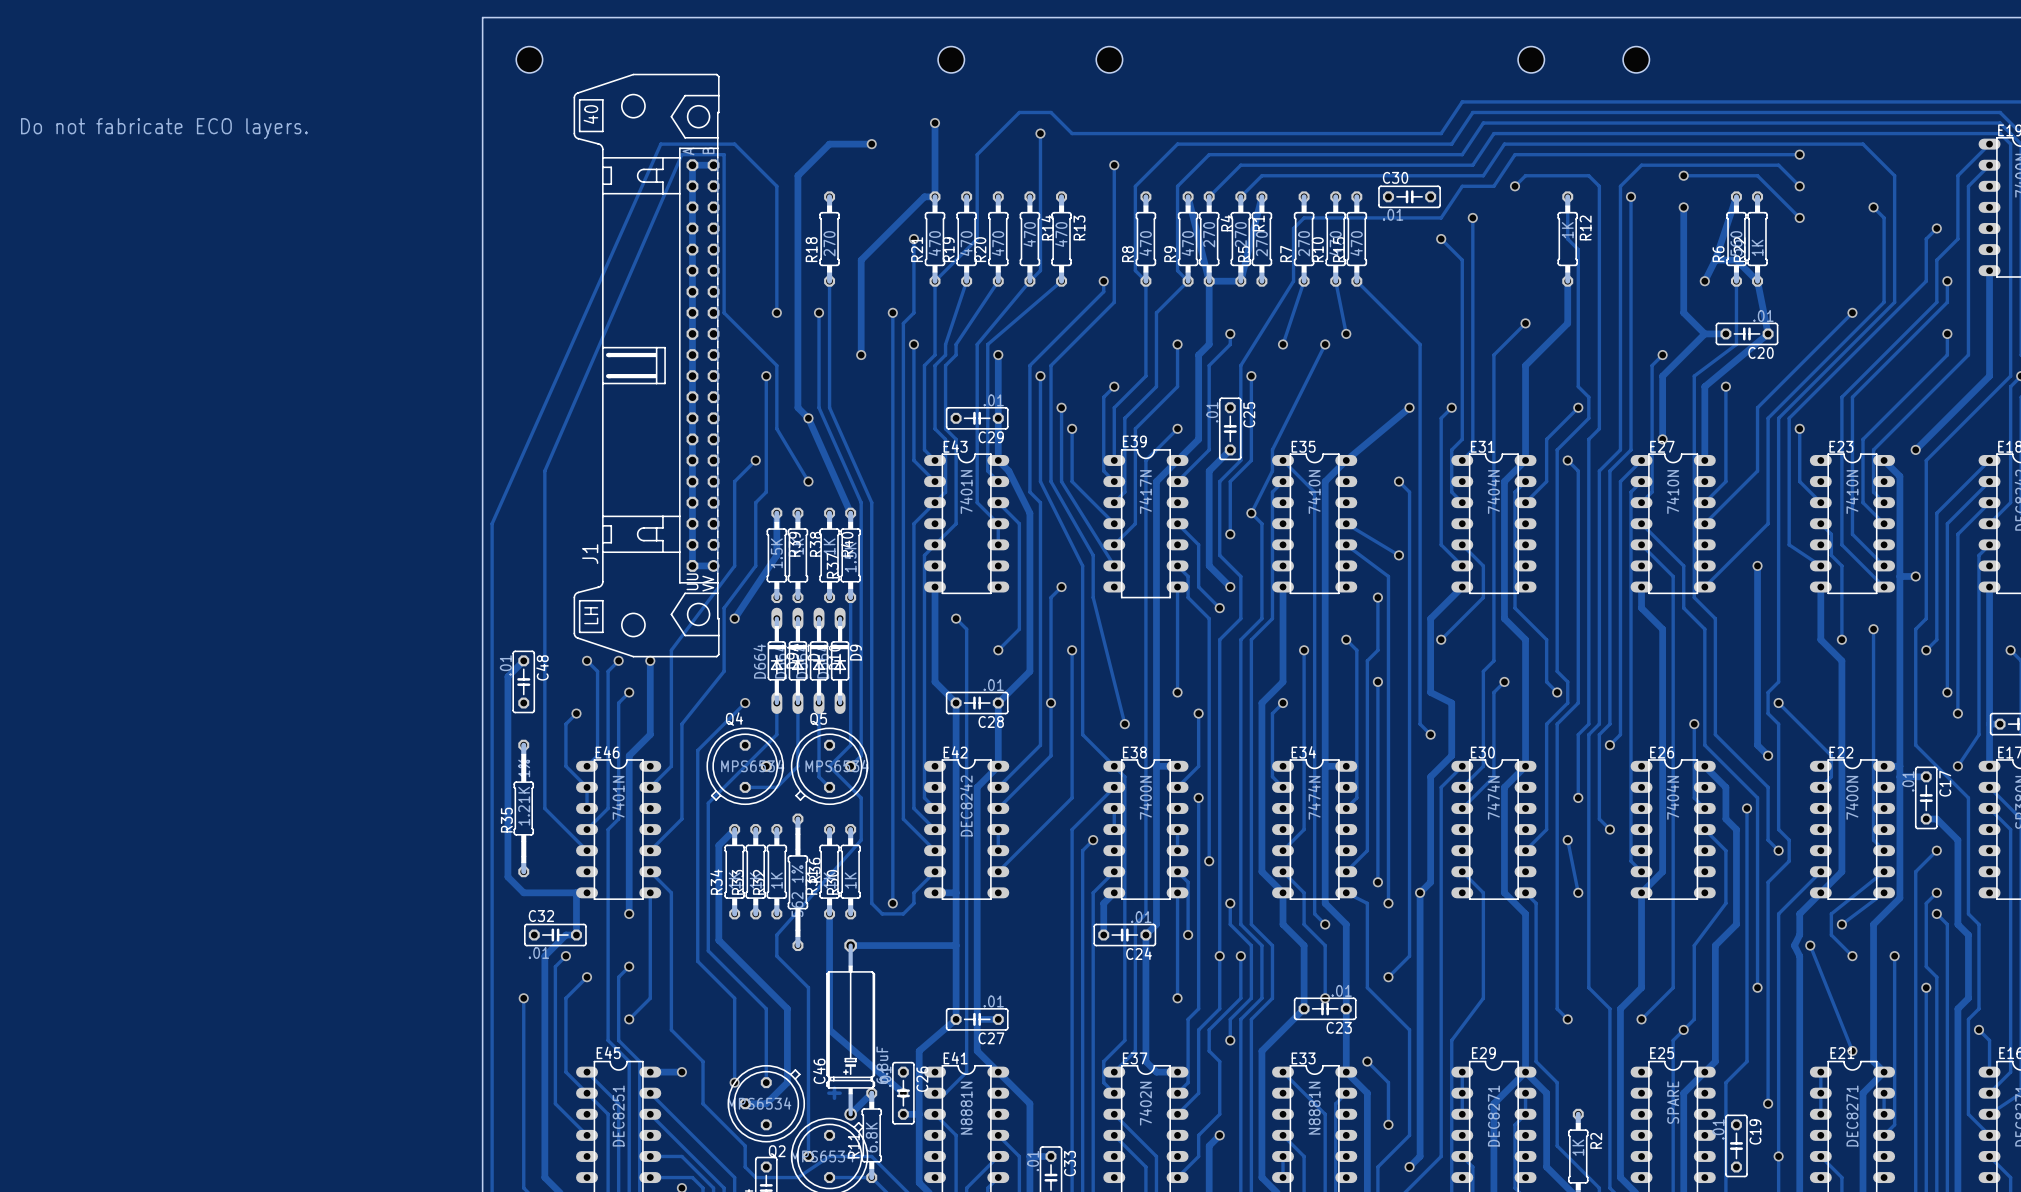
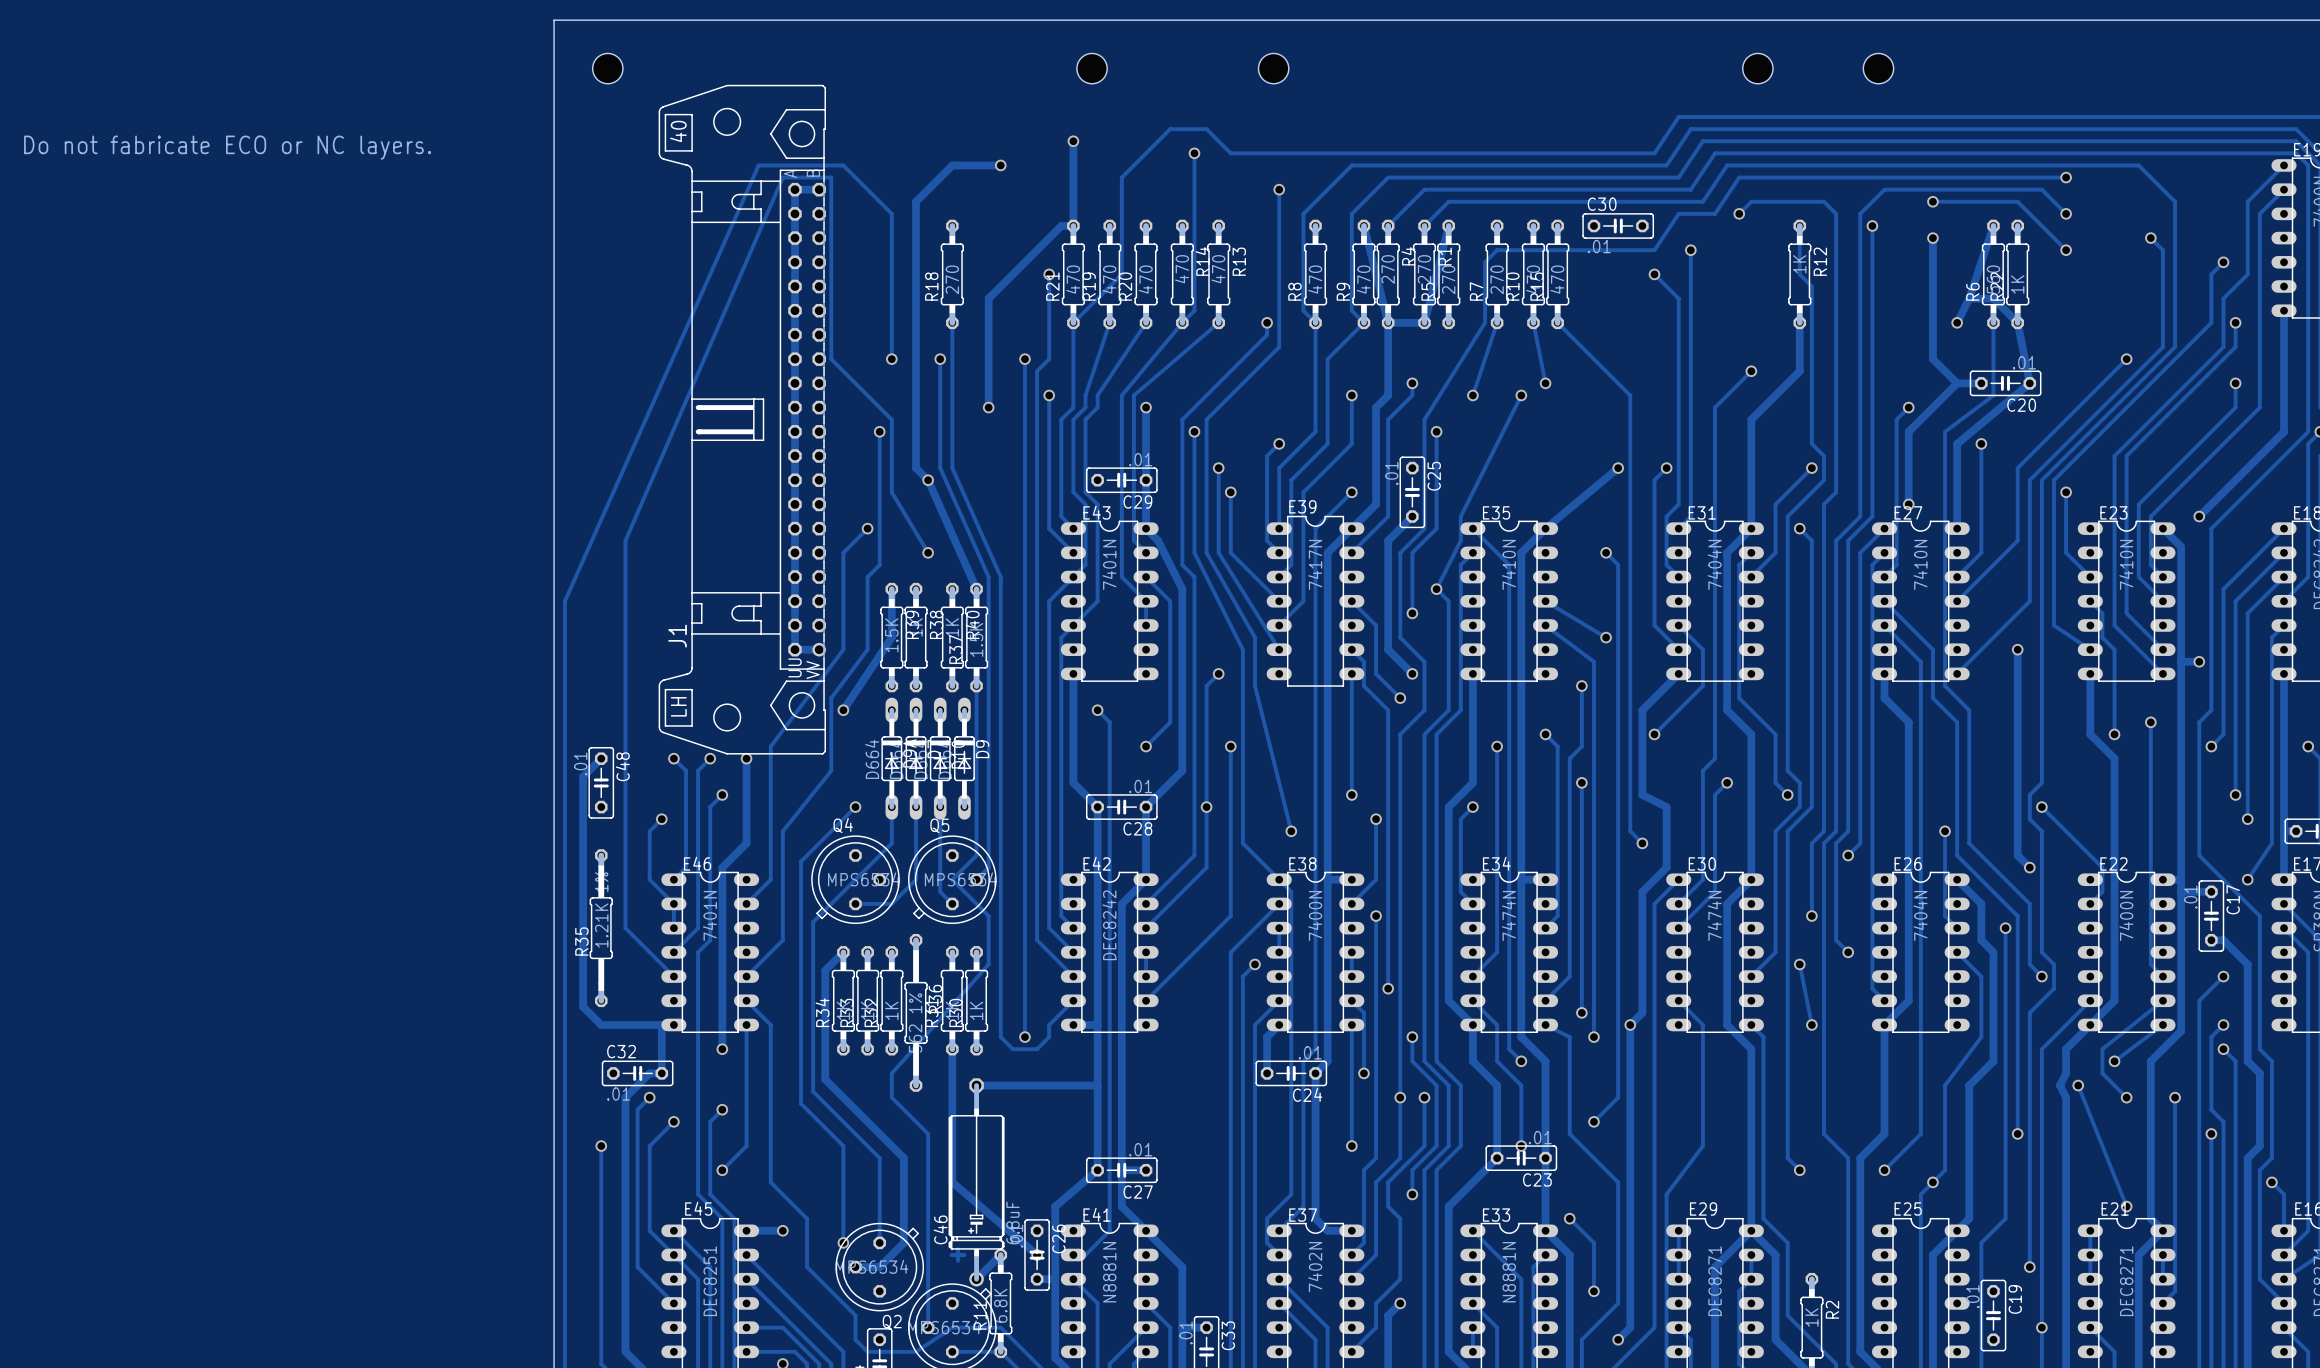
text: Do not fabricate ECO layers. (164, 128) -> Do not fabricate ECO or NC layers. (227, 147)
E25 value: SPARE (1673, 1102) -> none

